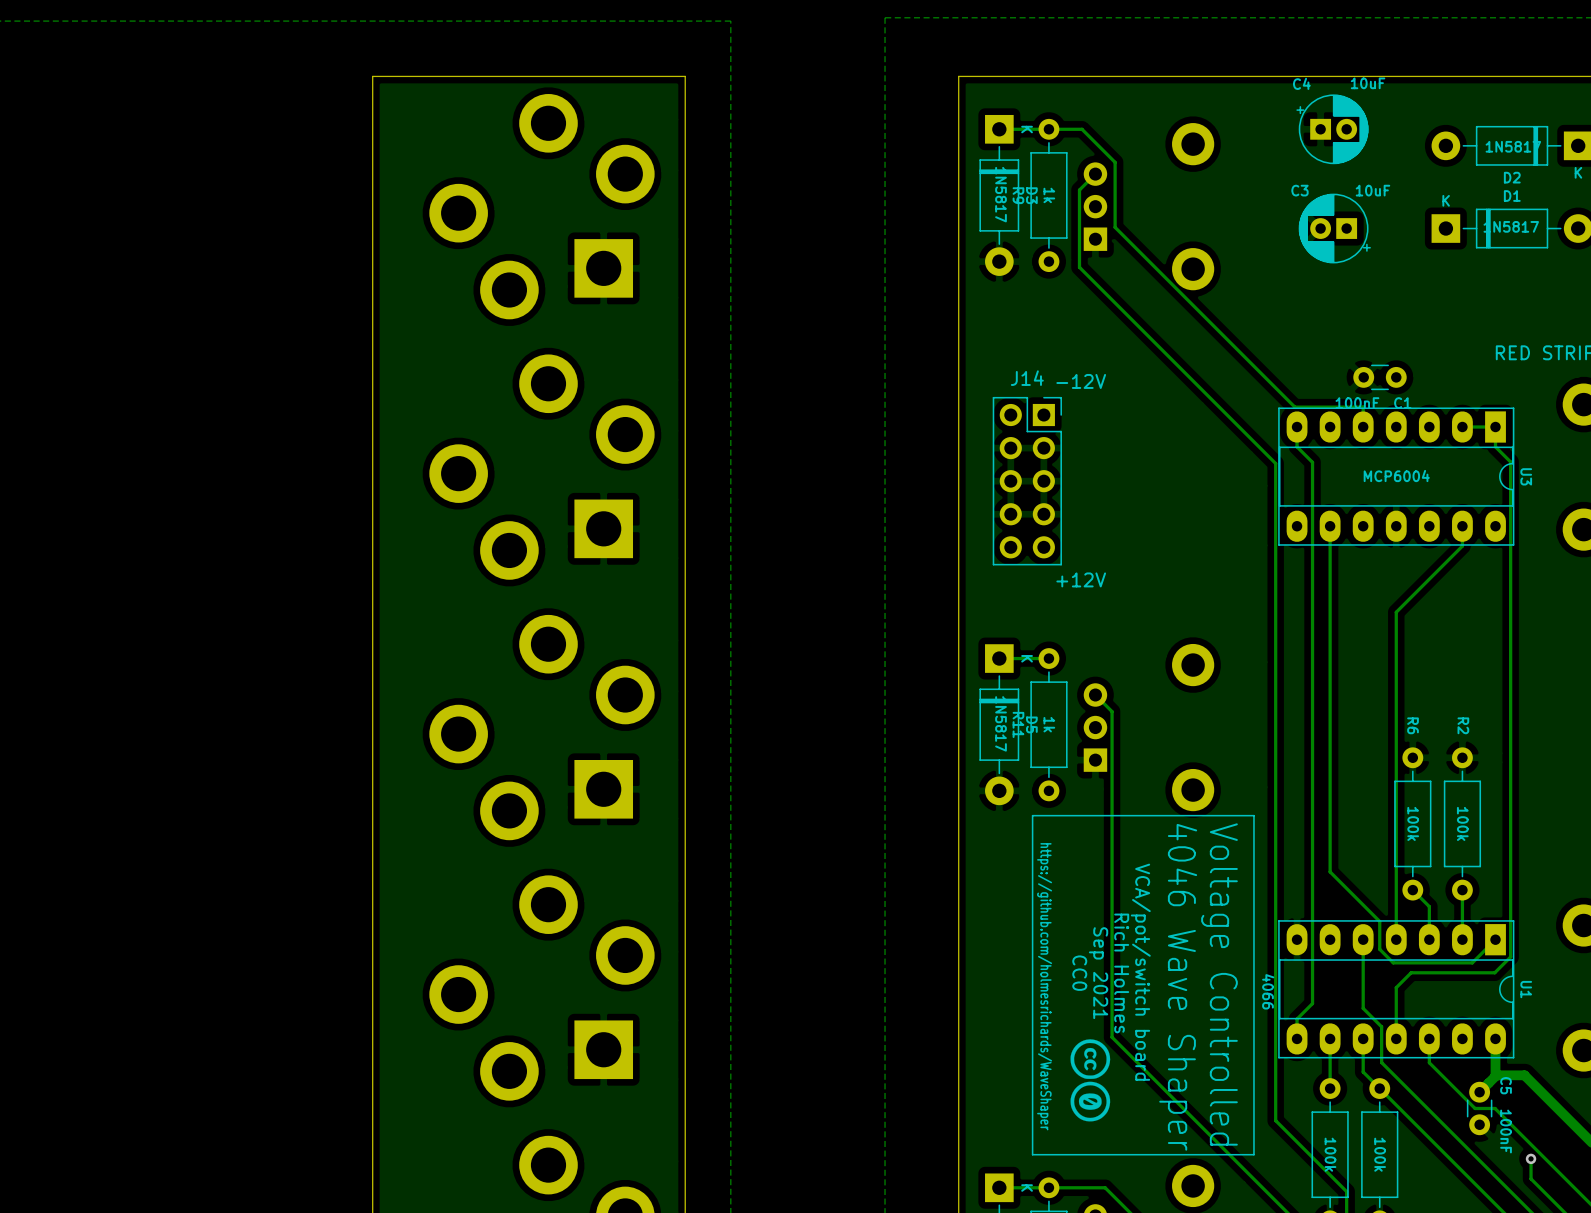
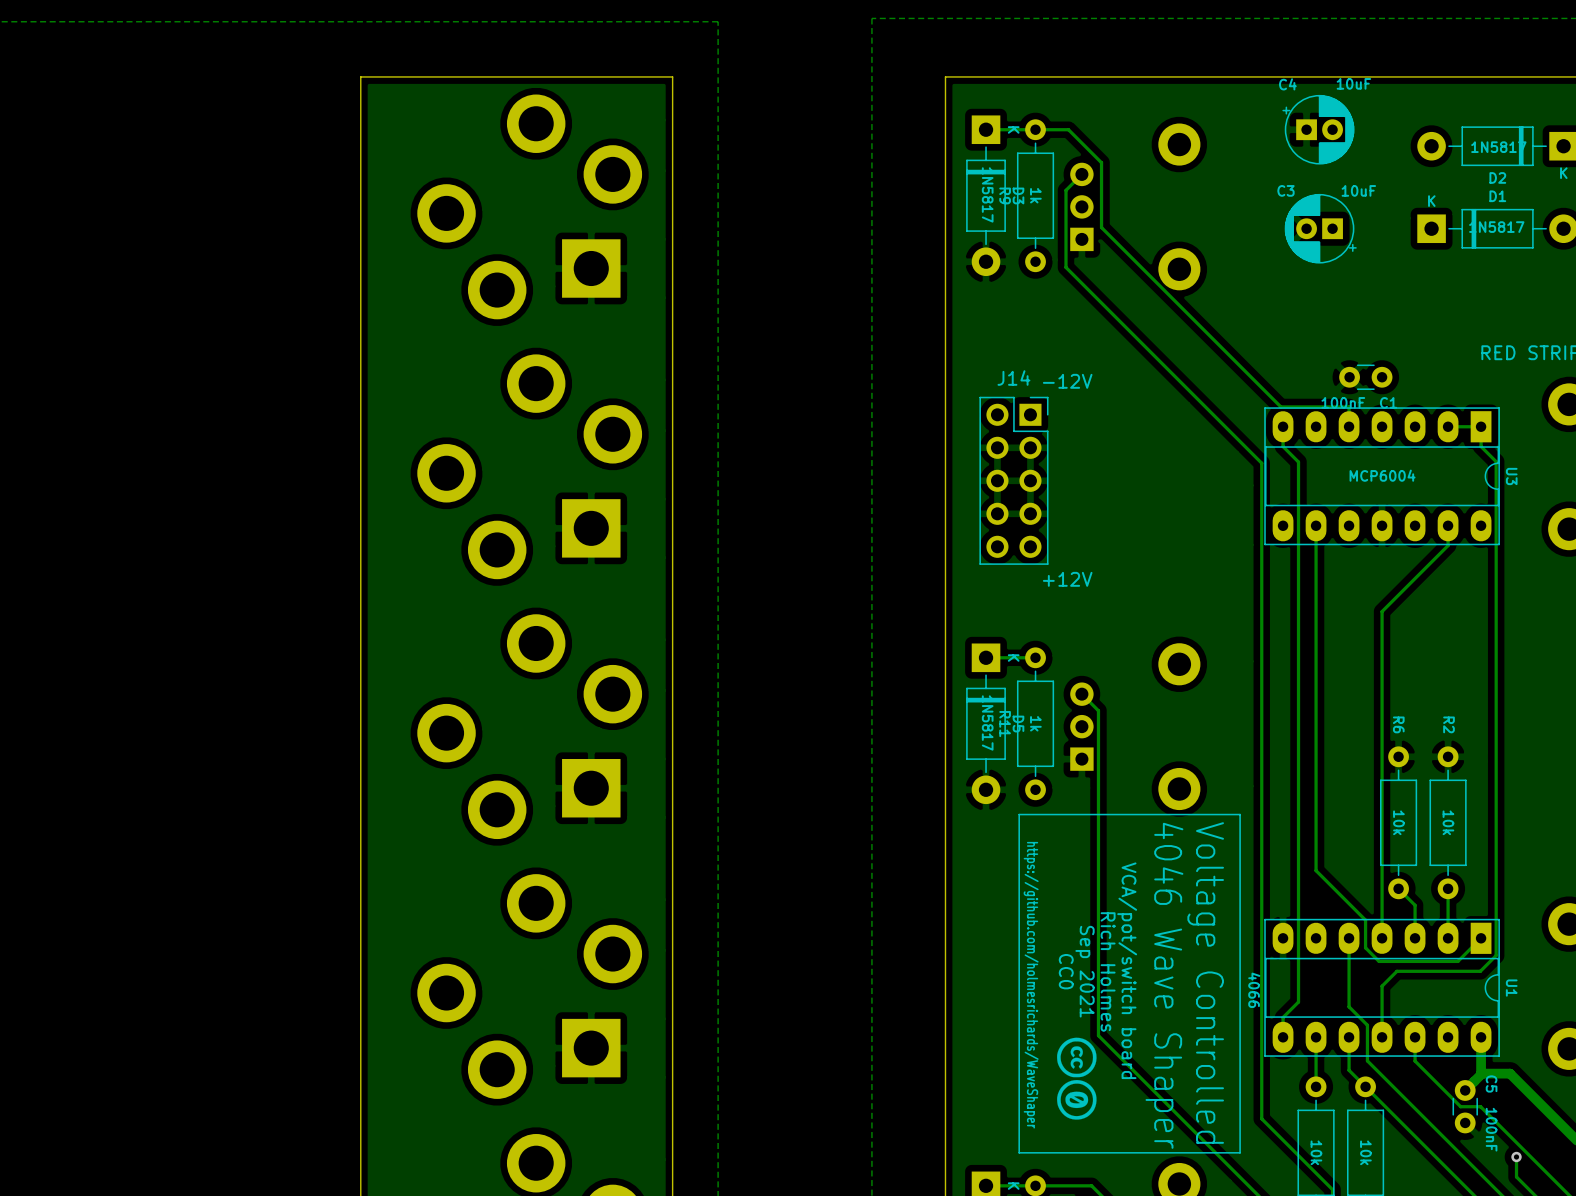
R6 value: 100k (1413, 823) -> 10k (1398, 822)
R2 value: 100k (1462, 823) -> 10k (1448, 822)
part value: 100k (1330, 1154) -> 10k (1316, 1152)
part value: 100k (1380, 1154) -> 10k (1365, 1152)

